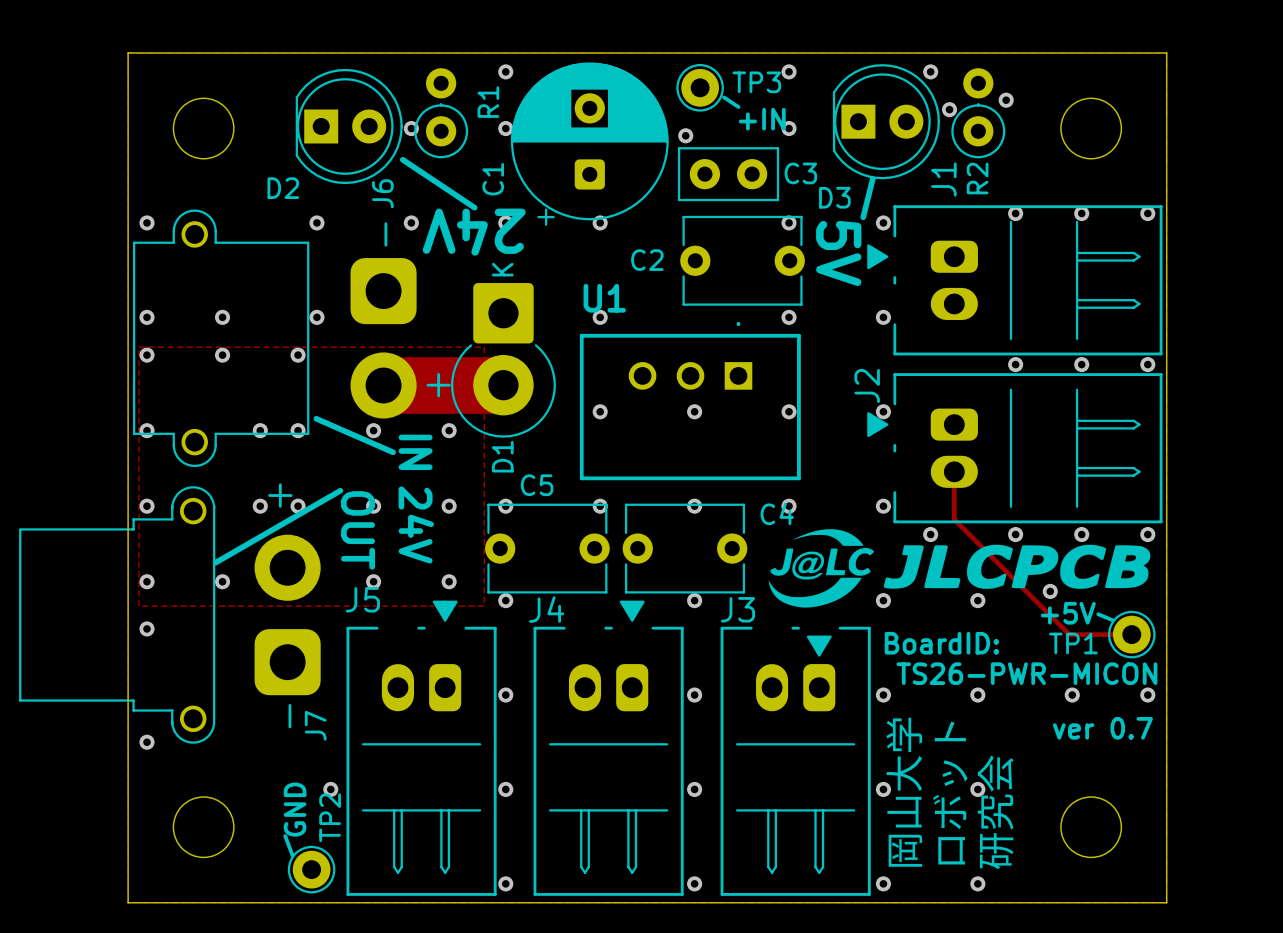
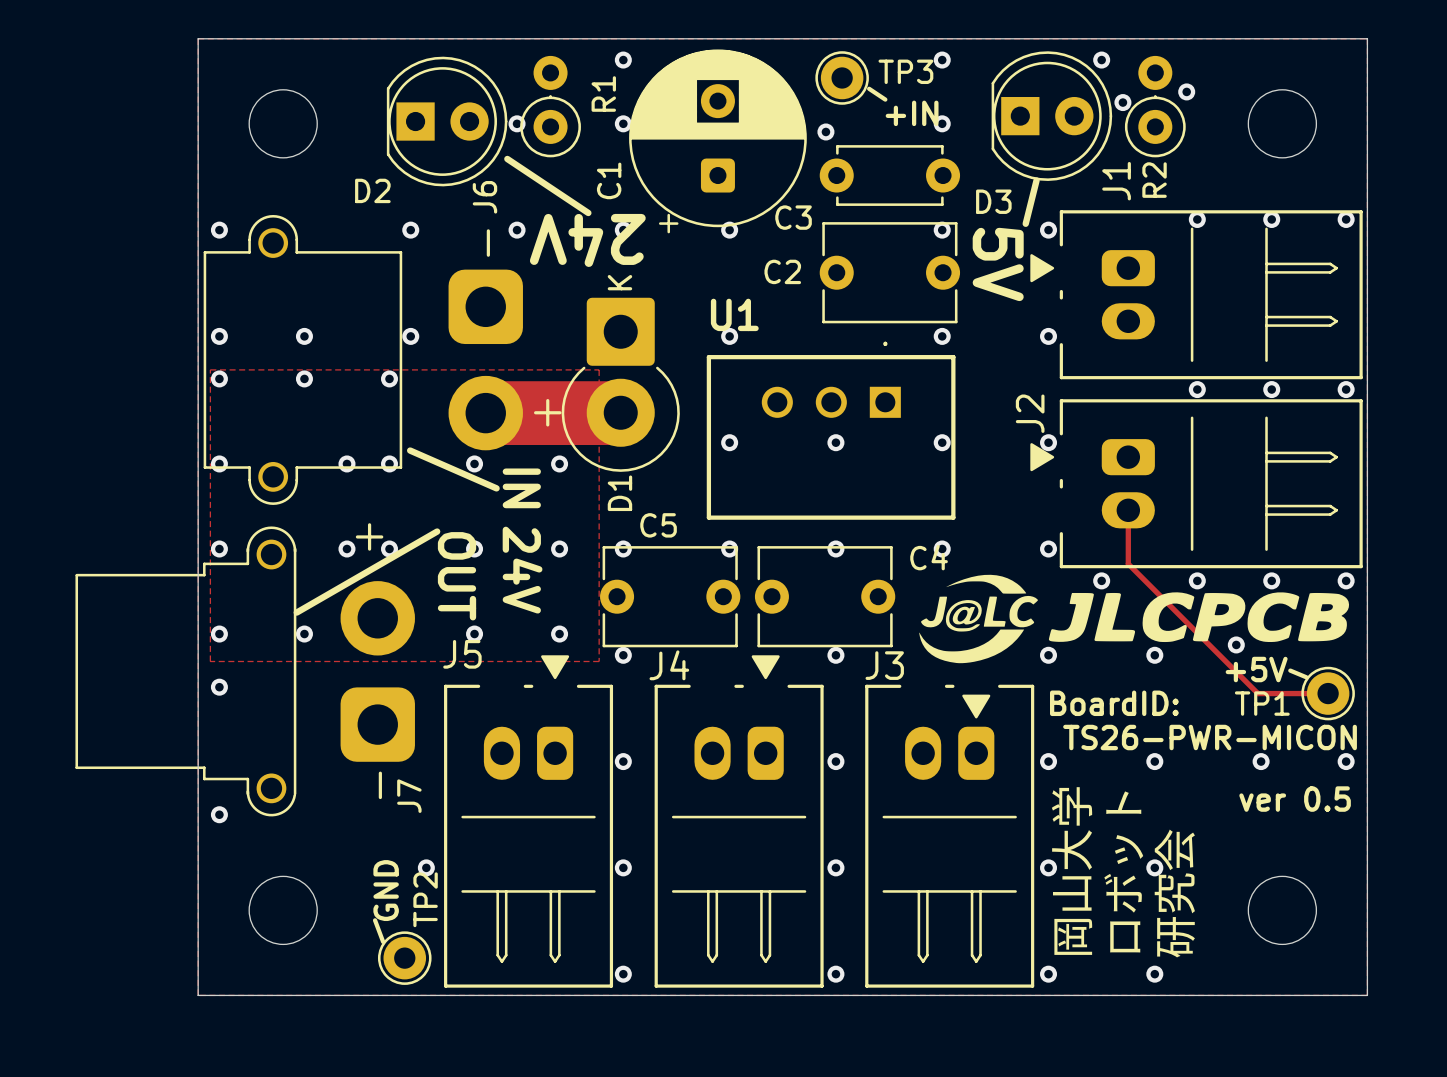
C3 footprint: [677, 147, 780, 202] -> [819, 145, 961, 206]
C3 name position: C3 (800, 173) -> C3 (793, 217)
text: ver 0.7 (1102, 728) -> ver 0.5 (1295, 799)

